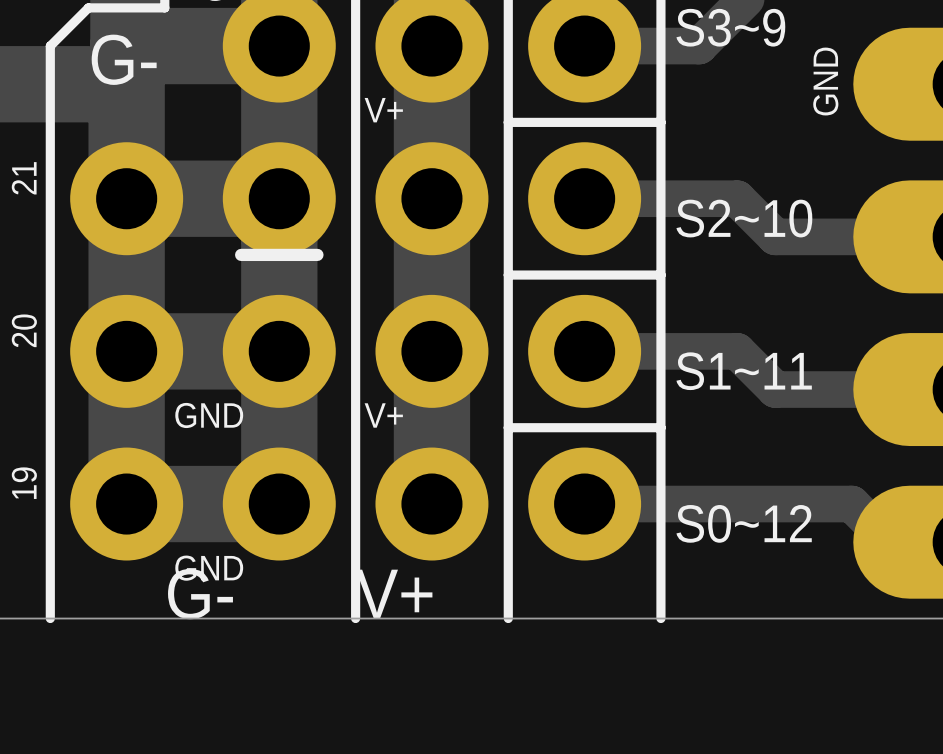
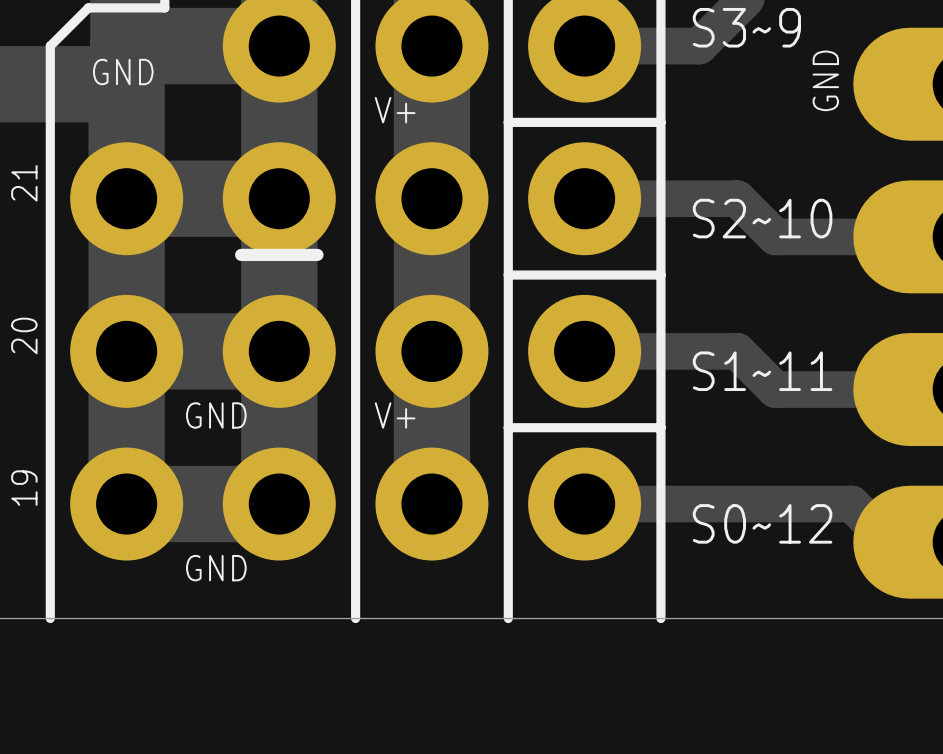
text: G- (124, 59) -> GND (123, 72)
text: G- (200, 594) -> none
text: V+ (394, 594) -> none

